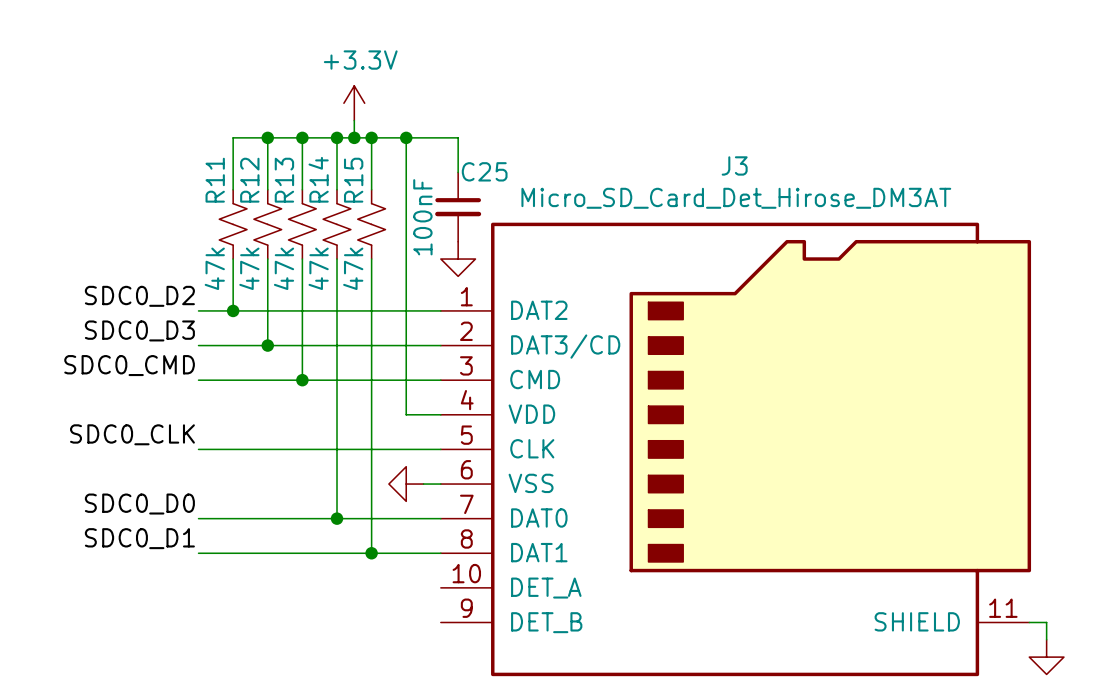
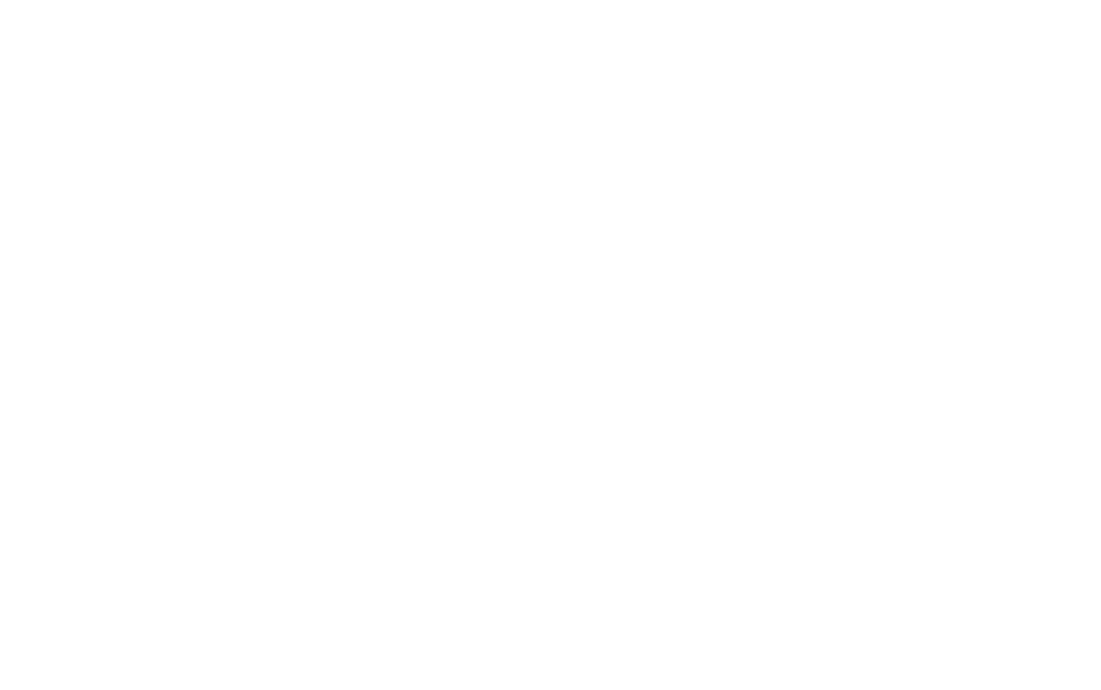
power symbol: +3.3V (354, 103) -> none
wire: (354, 120) (354, 137) -> none
wire: (267, 137) (267, 189) -> none
junction: (267, 137) -> none
wire: (302, 137) (302, 189) -> none
junction: (302, 137) -> none
wire: (337, 137) (337, 189) -> none
junction: (337, 137) -> none
junction: (354, 137) -> none
wire: (371, 137) (371, 189) -> none
junction: (371, 137) -> none
wire: (406, 137) (406, 414) (440, 414) -> none
junction: (406, 137) -> none
wire: (458, 172) (458, 137) (233, 137) (233, 189) -> none
C25: 100nF (458, 207) -> none
R11: 47k (233, 224) -> none
R12: 47k (267, 224) -> none
R13: 47k (302, 224) -> none
R14: 47k (337, 224) -> none
R15: 47k (371, 224) -> none
wire: (233, 259) (233, 310) -> none
wire: (267, 259) (267, 345) -> none
wire: (302, 259) (302, 380) -> none
wire: (337, 259) (337, 518) -> none
wire: (371, 259) (371, 553) -> none
power symbol: (458, 259) -> none
label: SDC0_D2 (139, 296) -> none
wire: (198, 310) (440, 310) -> none
junction: (233, 310) -> none
label: SDC0_D3 (139, 330) -> none
wire: (198, 345) (440, 345) -> none
junction: (267, 345) -> none
label: SDC0_CMD (129, 365) -> none
wire: (198, 380) (440, 380) -> none
junction: (302, 380) -> none
label: SDC0_CLK (132, 434) -> none
wire: (198, 449) (440, 449) -> none
J3: Micro_SD_Card_Det_Hirose_DM3AT (735, 449) -> none
power symbol: (406, 484) -> none
wire: (423, 484) (440, 484) -> none
label: SDC0_D0 (139, 504) -> none
wire: (198, 518) (440, 518) -> none
junction: (337, 518) -> none
label: SDC0_D1 (139, 538) -> none
wire: (198, 553) (440, 553) -> none
junction: (371, 553) -> none
wire: (1029, 622) (1046, 622) (1046, 639) -> none
power symbol: (1046, 657) -> none

